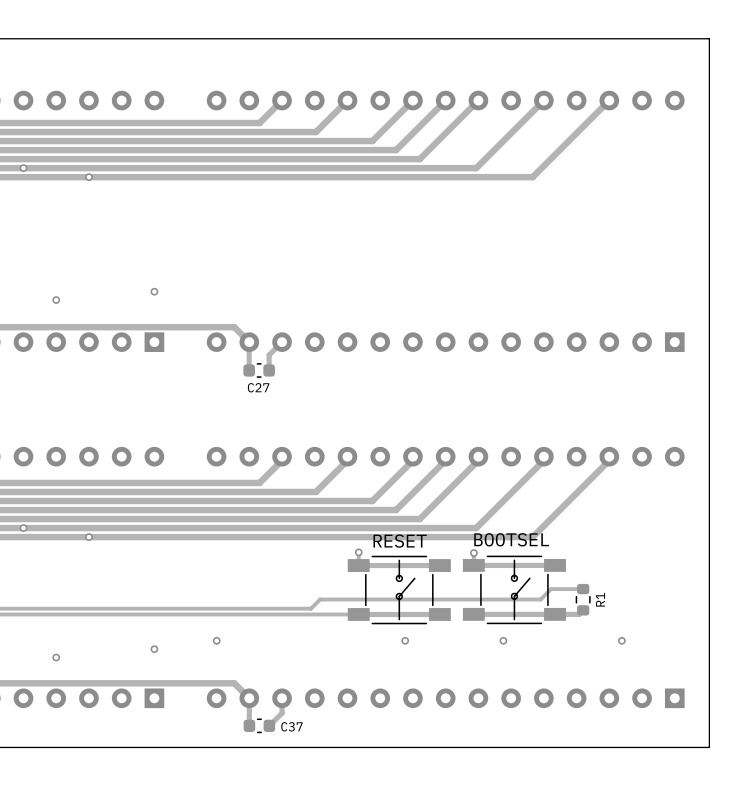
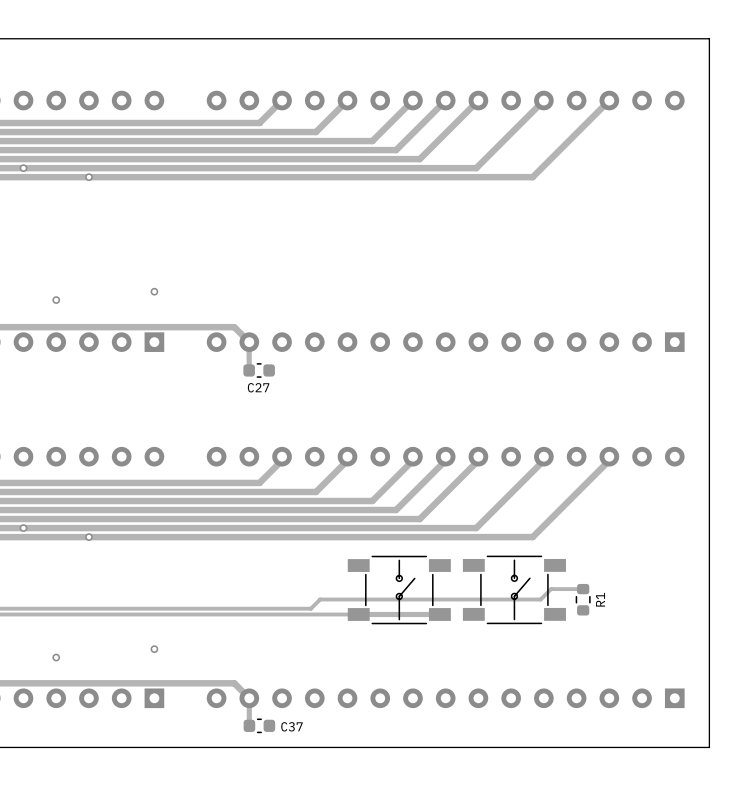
track: (282, 342) (269, 355) (269, 370) -> none
text: BOOTSEL (511, 539) -> none
text: RESET (400, 541) -> none
track: (358, 552) (358, 565) (439, 565) -> none
via: (358, 552) -> none
track: (473, 553) (473, 565) (555, 565) -> none
via: (473, 553) -> none
track: (583, 610) (579, 614) (473, 614) -> none
via: (216, 640) -> none
via: (405, 640) -> none
via: (503, 640) -> none
via: (621, 640) -> none
track: (282, 698) (282, 713) (269, 725) -> none

